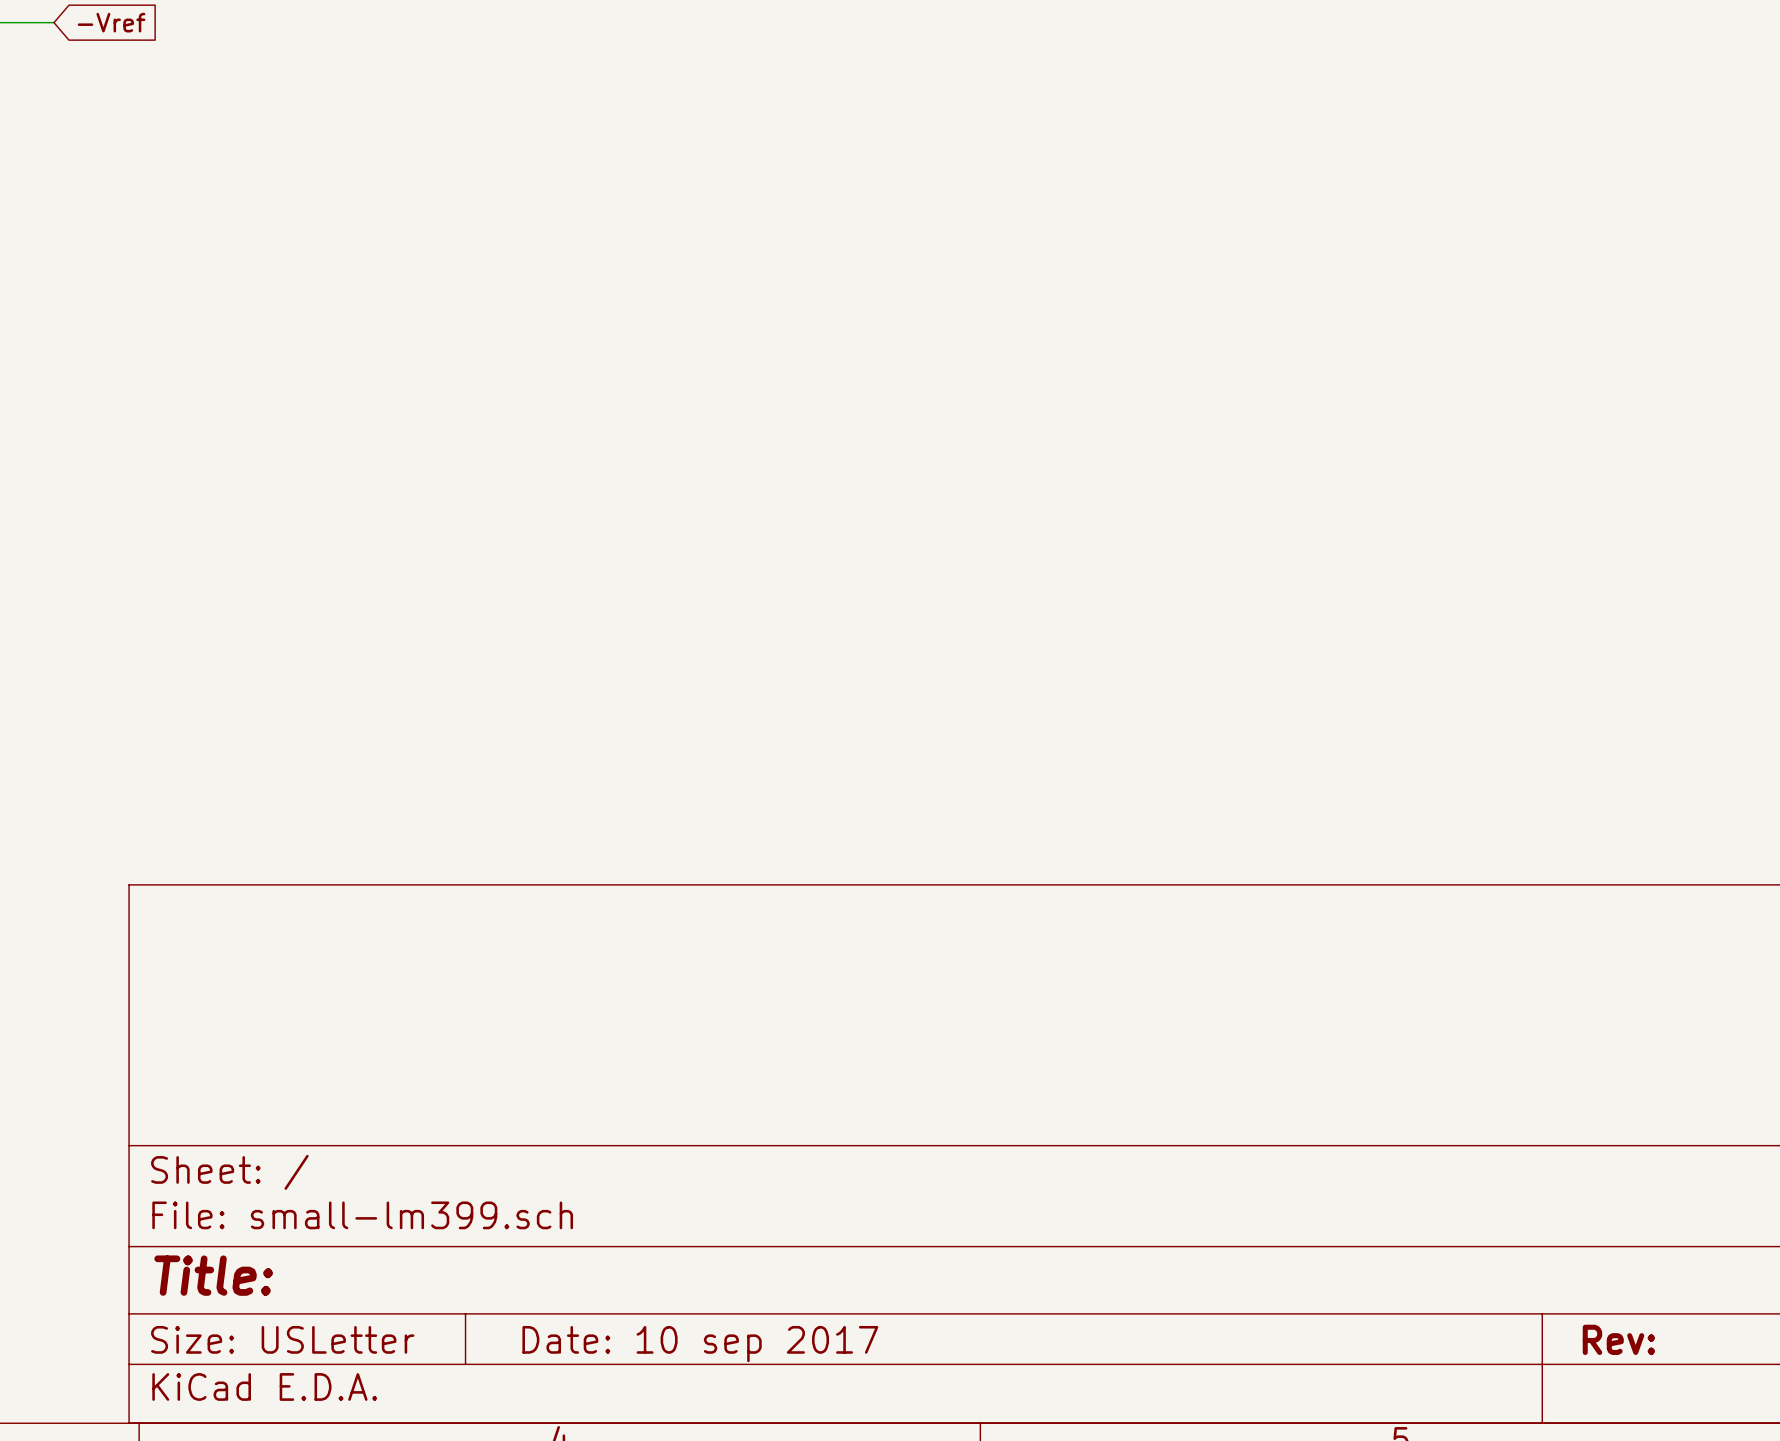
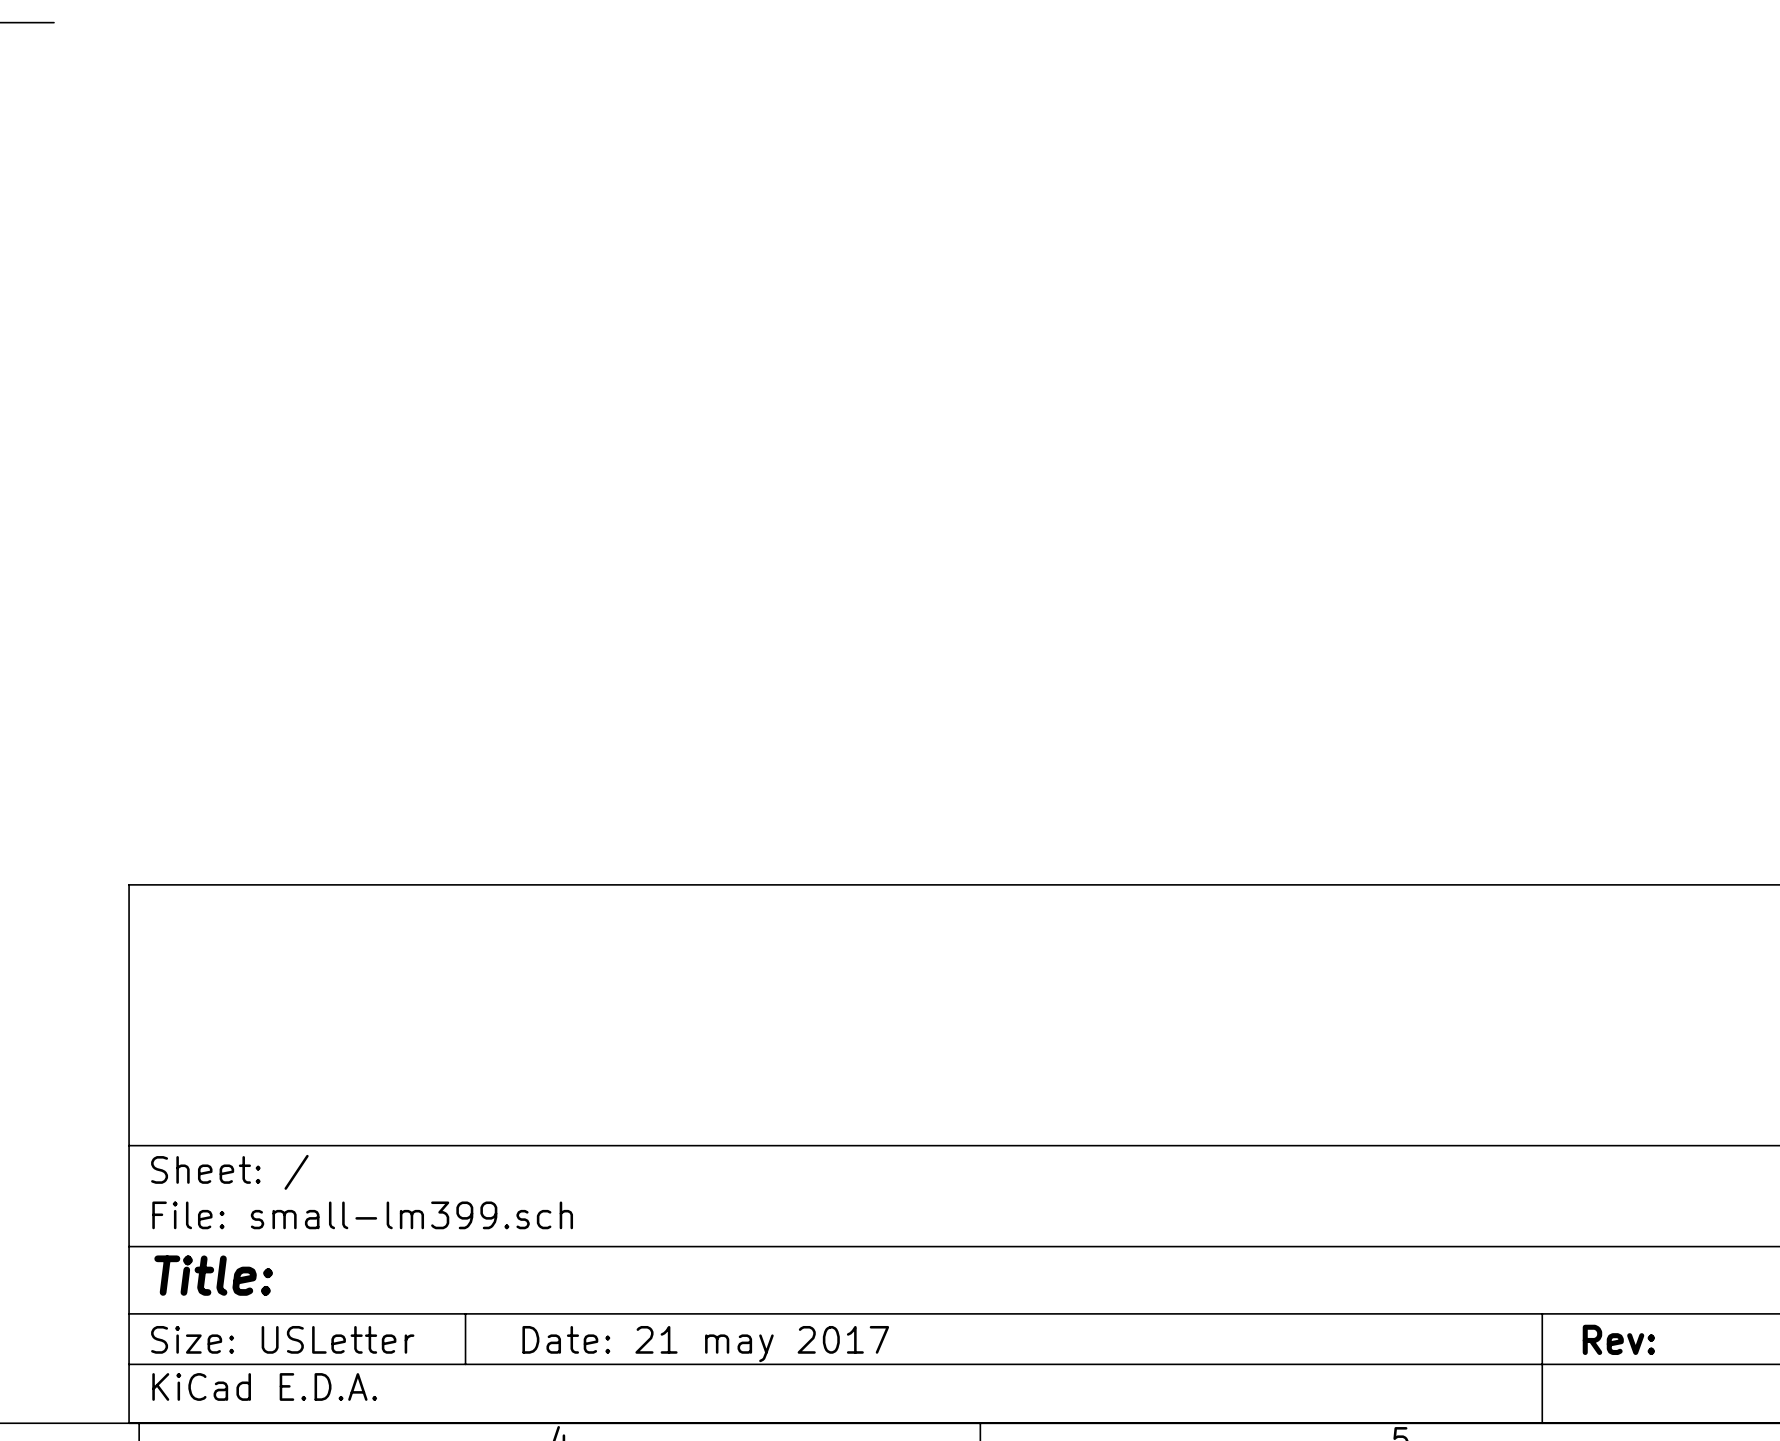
global label: -Vref (111, 22) -> none
title block: Date: 10 sep 2017 (700, 1344) -> Date: 21 may 2017 (705, 1344)

